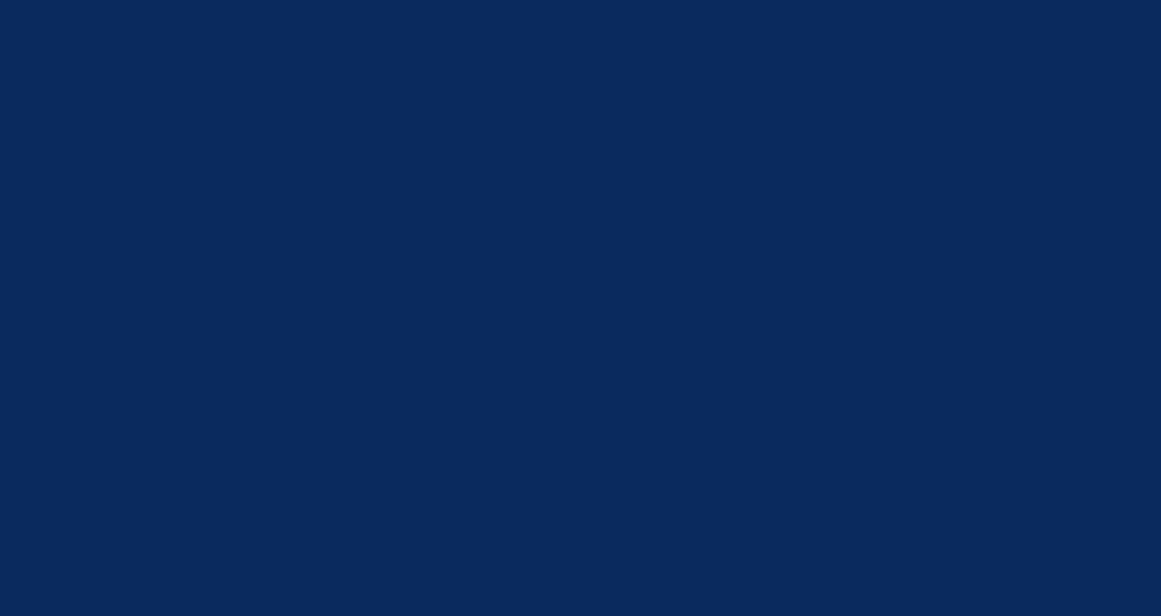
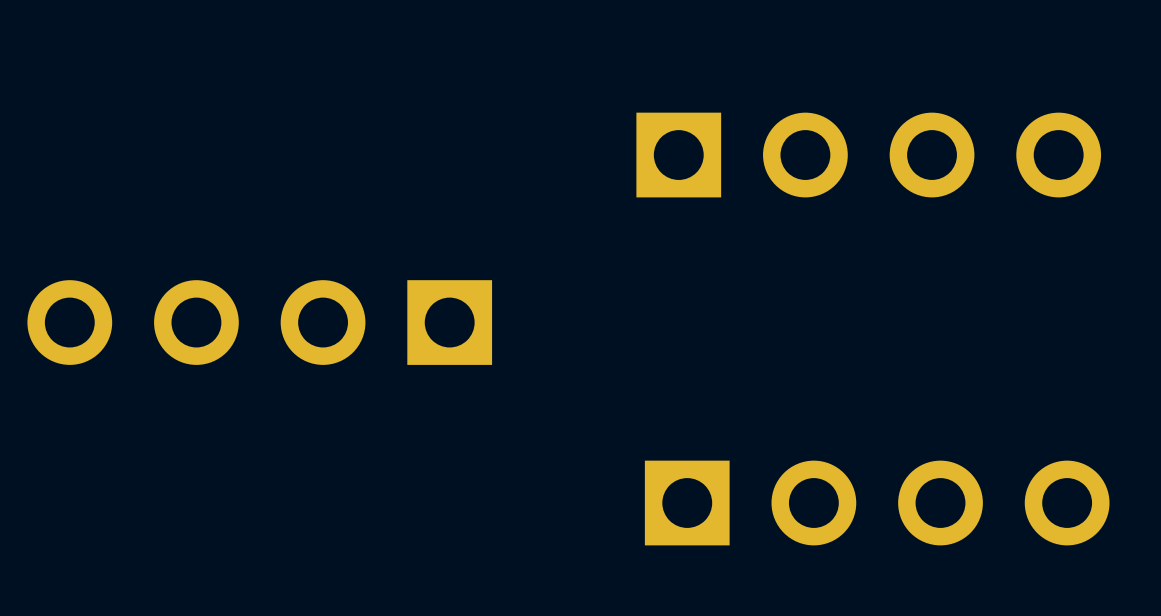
part: none -> (868, 155)
part: none -> (259, 322)
part: none -> (877, 503)

